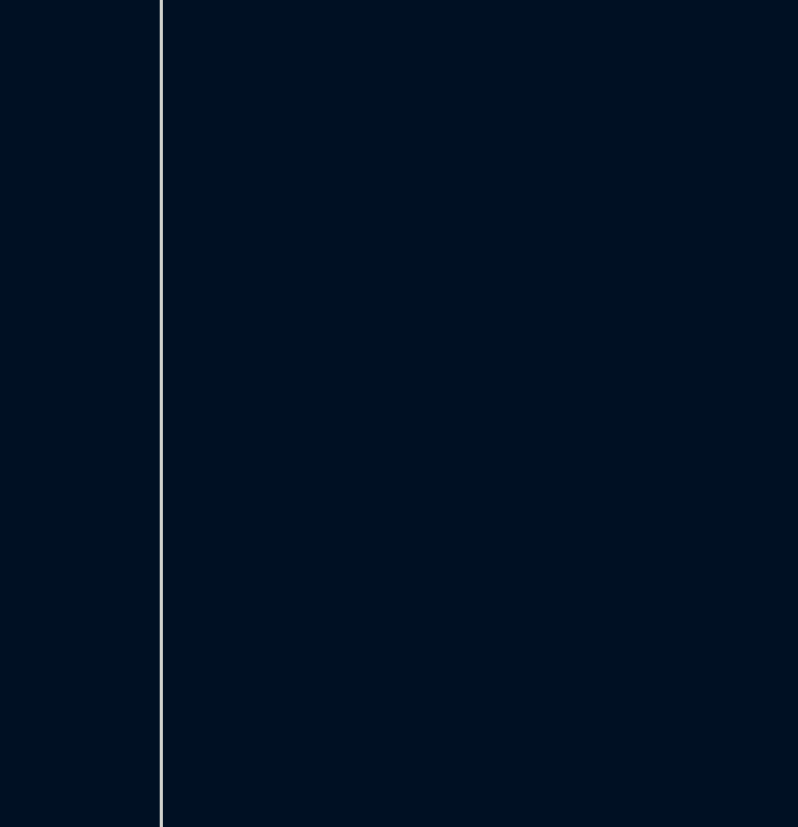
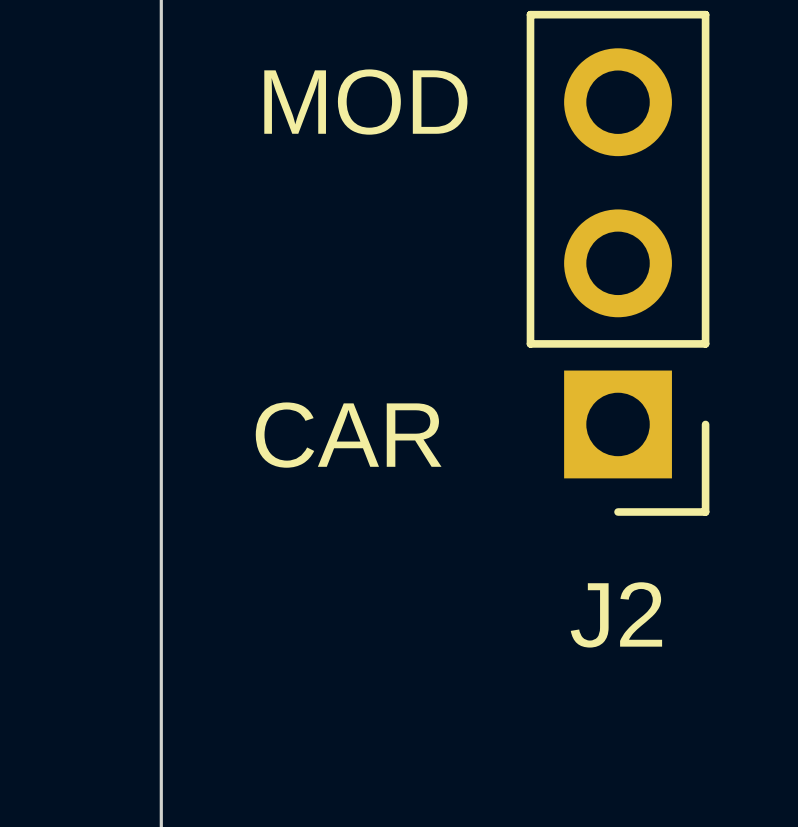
text: none -> MOD (365, 102)
J2: none -> (618, 263)
text: none -> CAR (348, 435)

